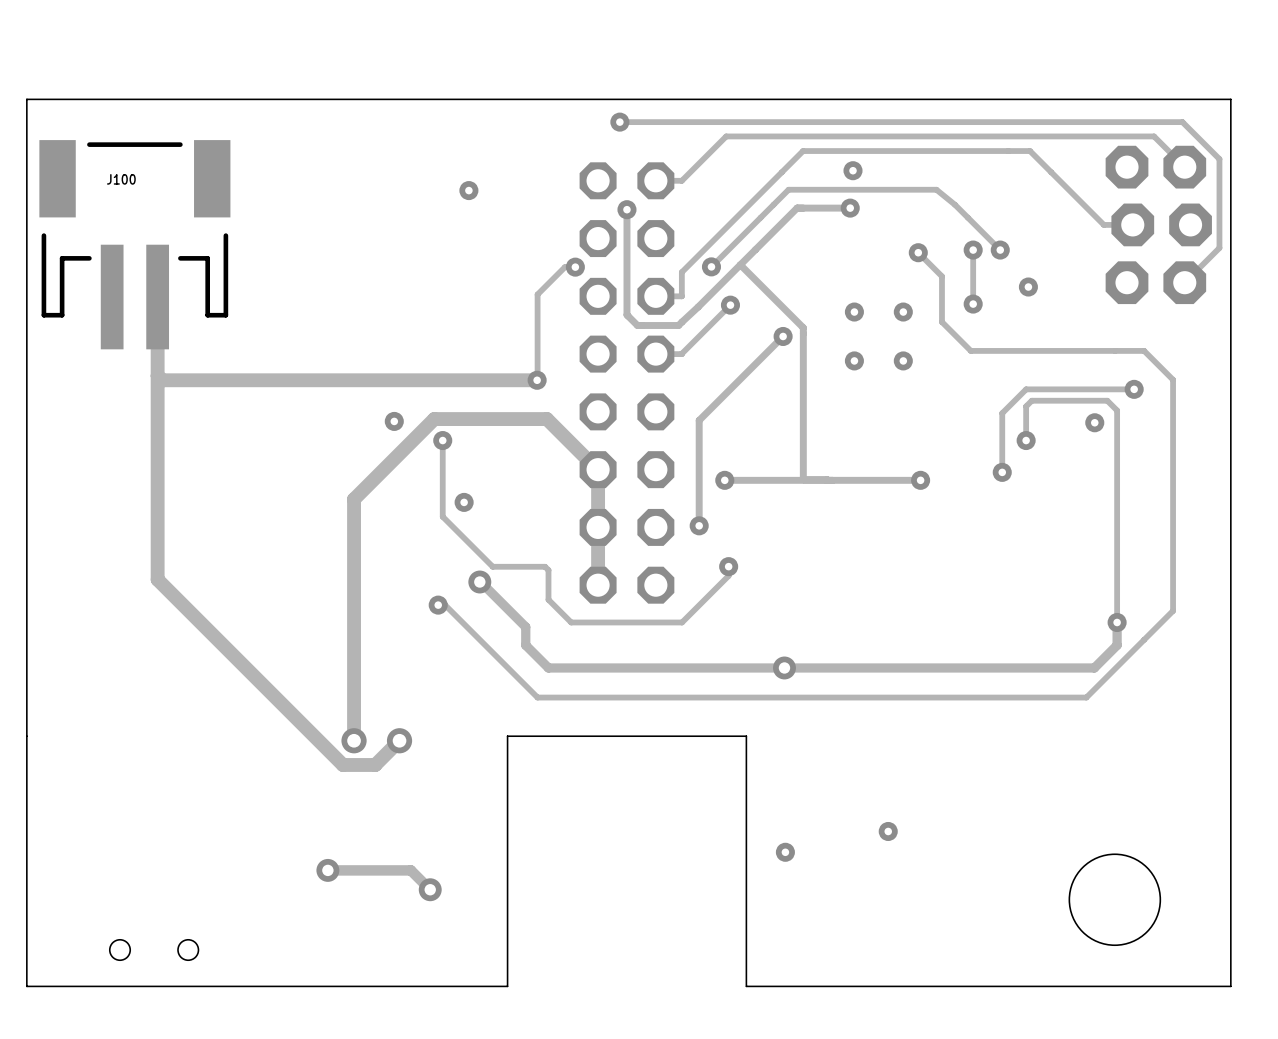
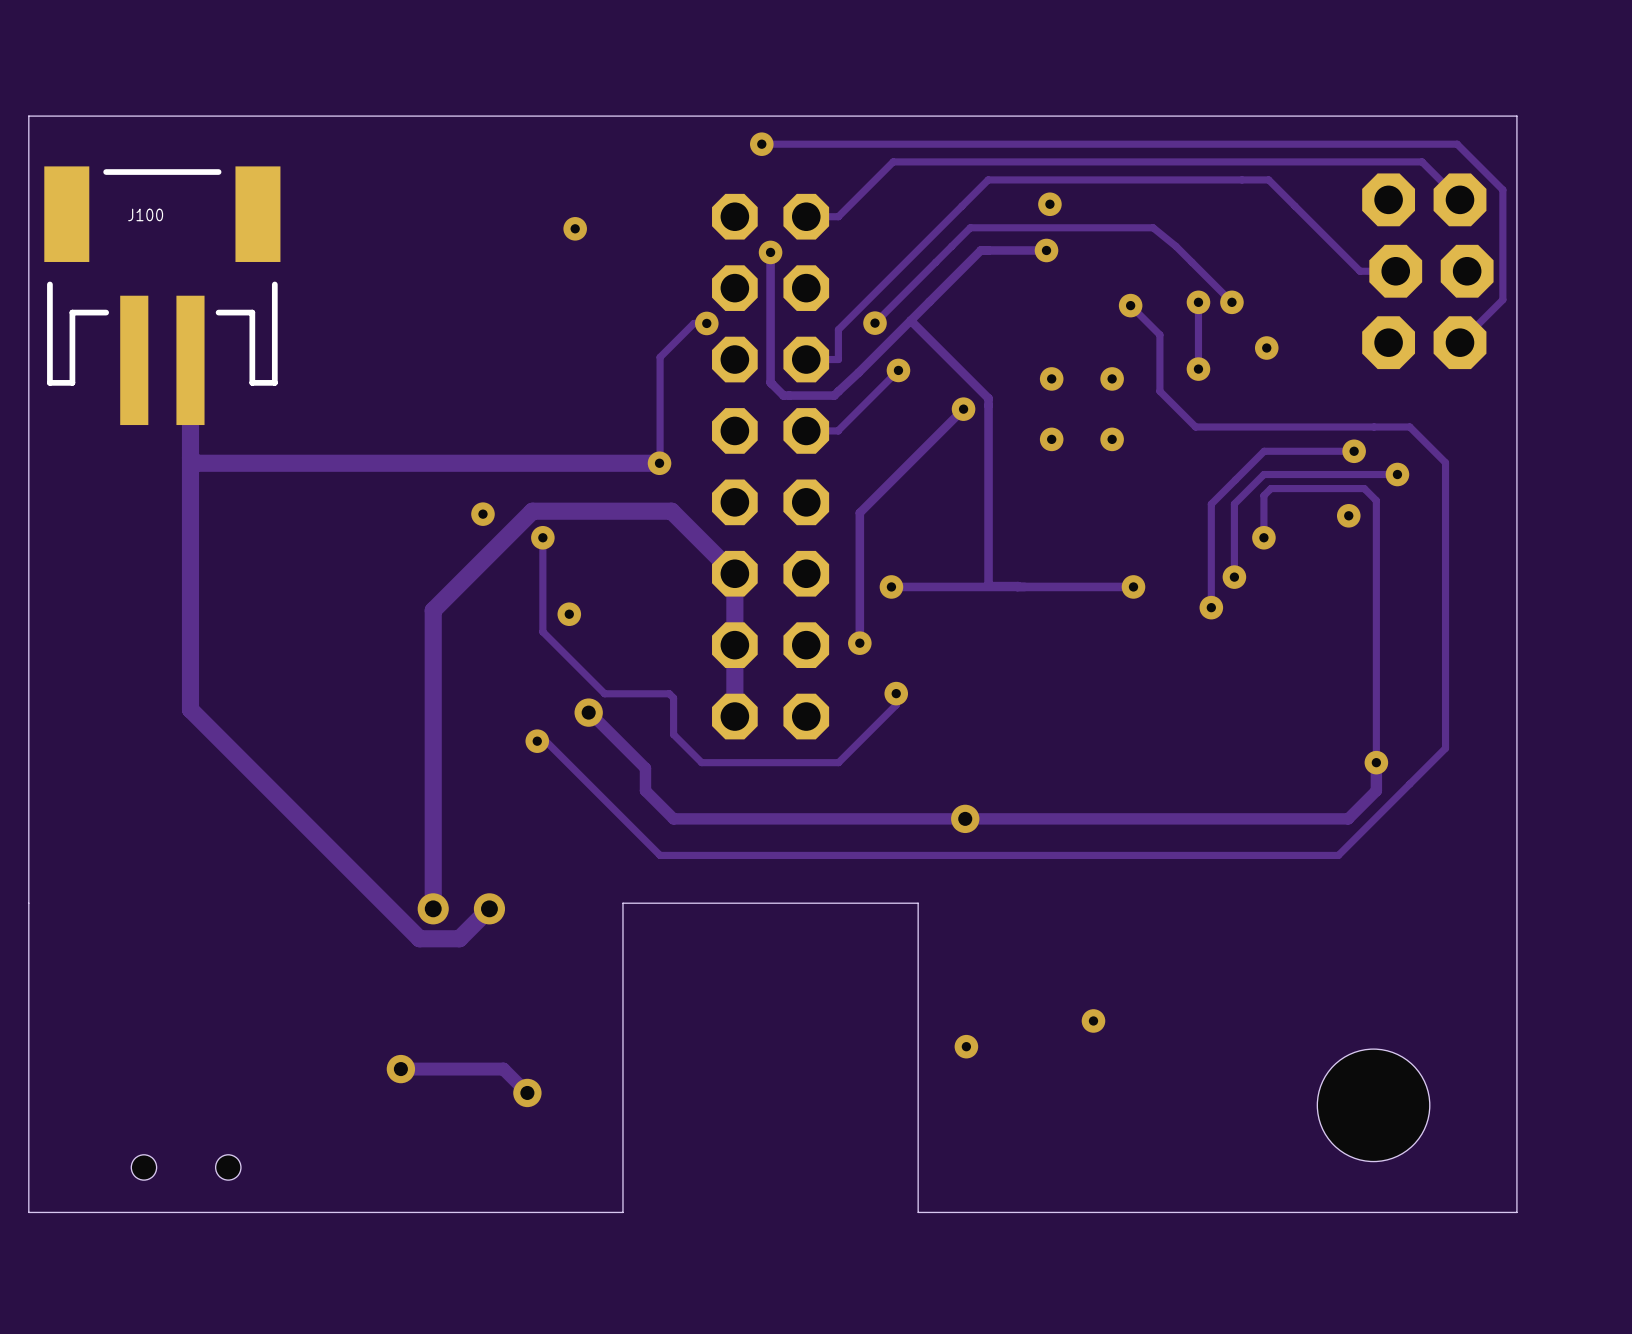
track: none -> (1354, 451) (1264, 451) (1211, 504) (1211, 607)
via: none -> (1354, 451)
via: none -> (1211, 607)

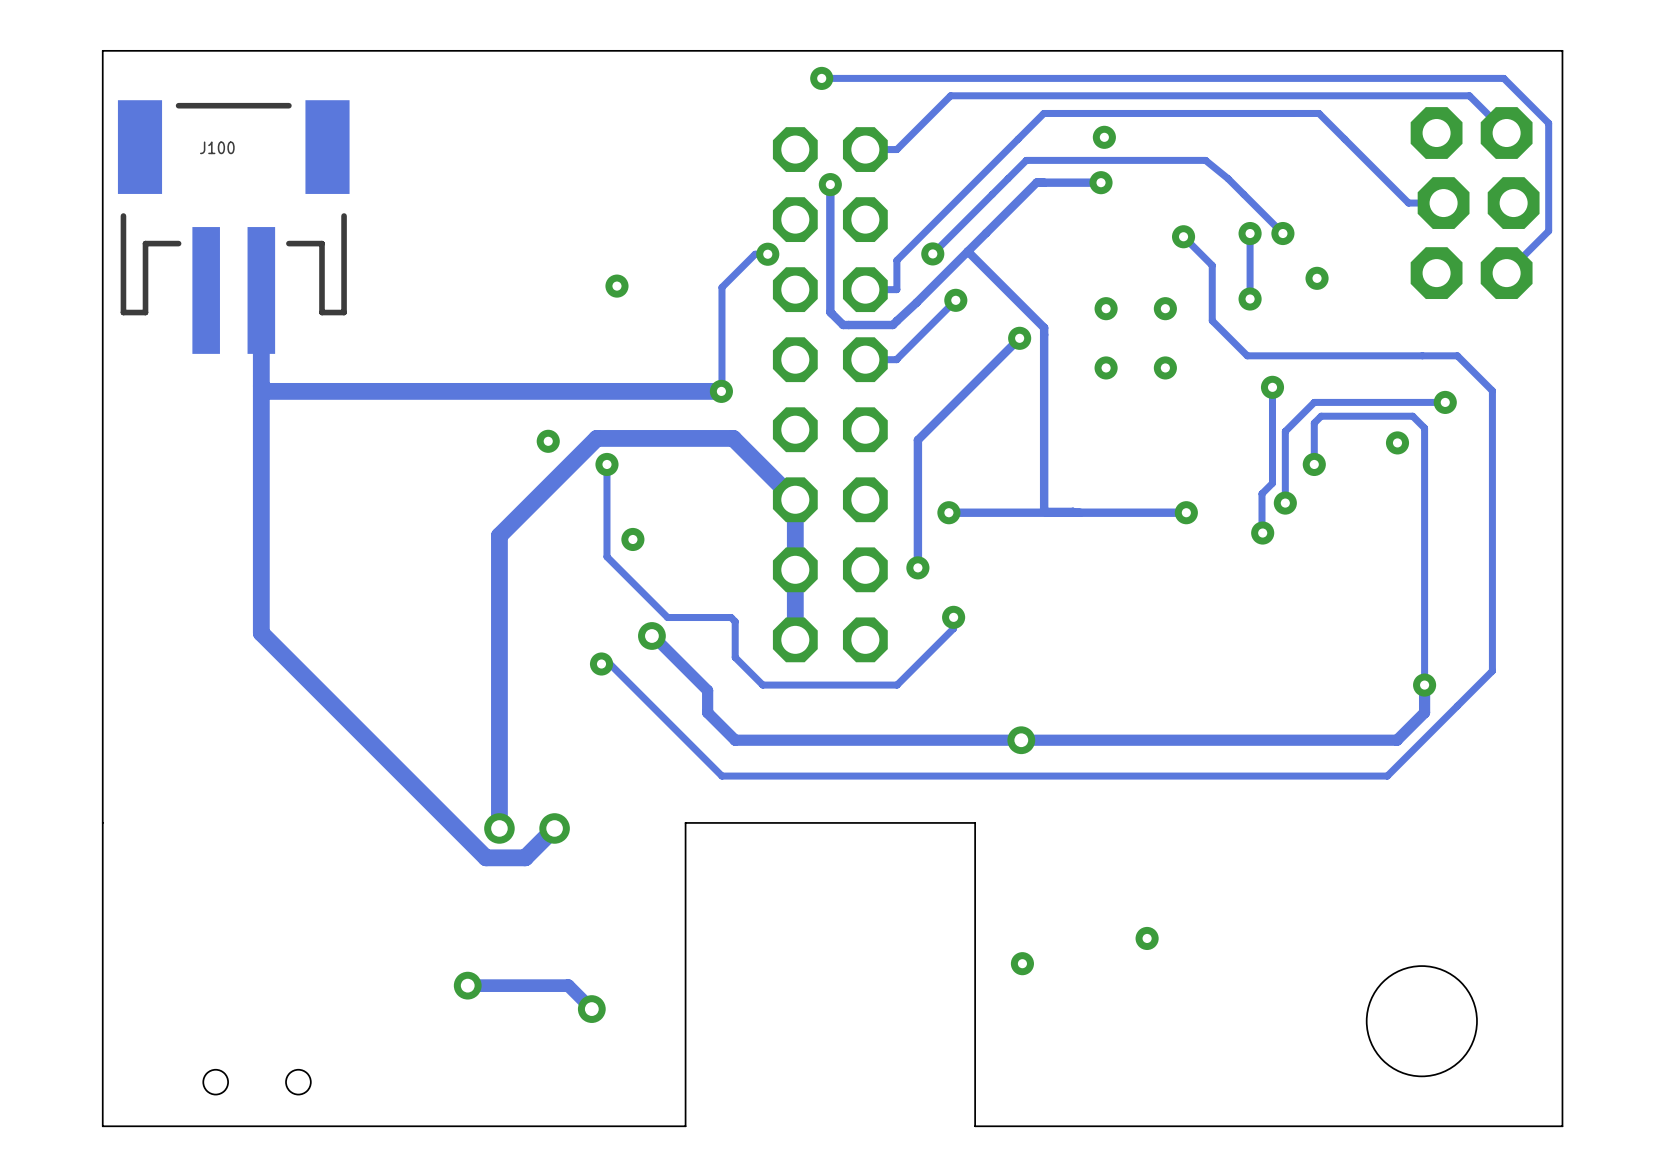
via position: (575, 228) -> (616, 286)
track: (1354, 451) (1264, 451) (1211, 504) (1211, 607) -> (1272, 387) (1272, 483) (1261, 493) (1261, 532)
via position: (1354, 451) -> (1272, 387)

